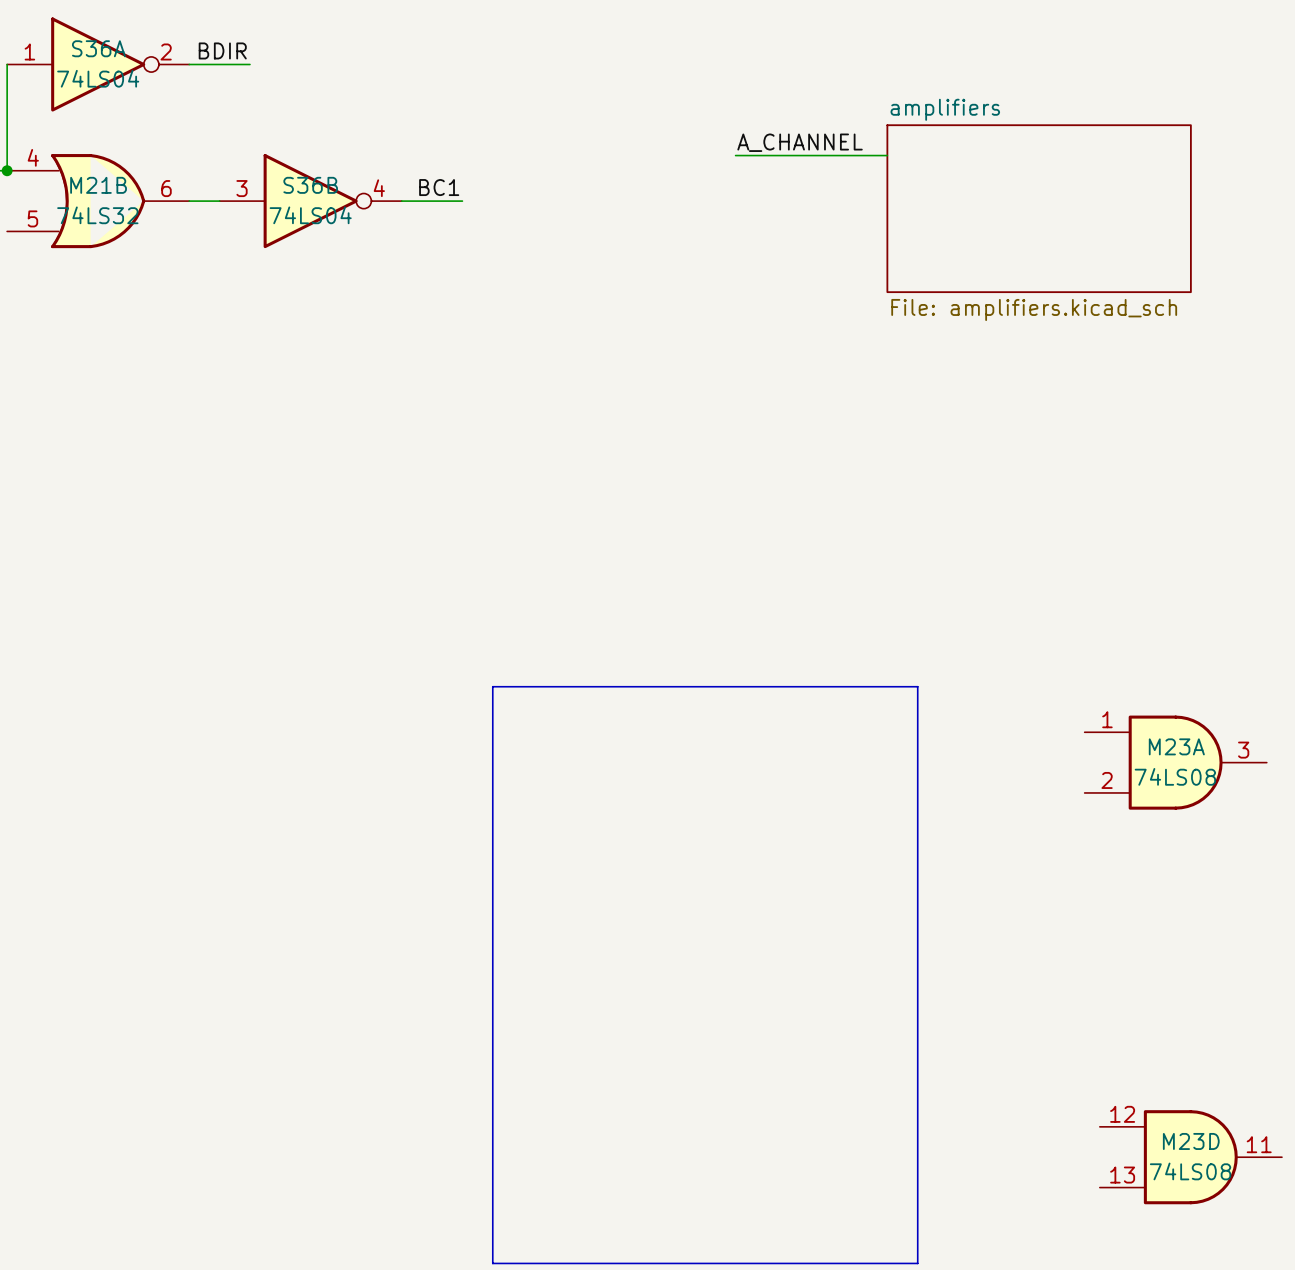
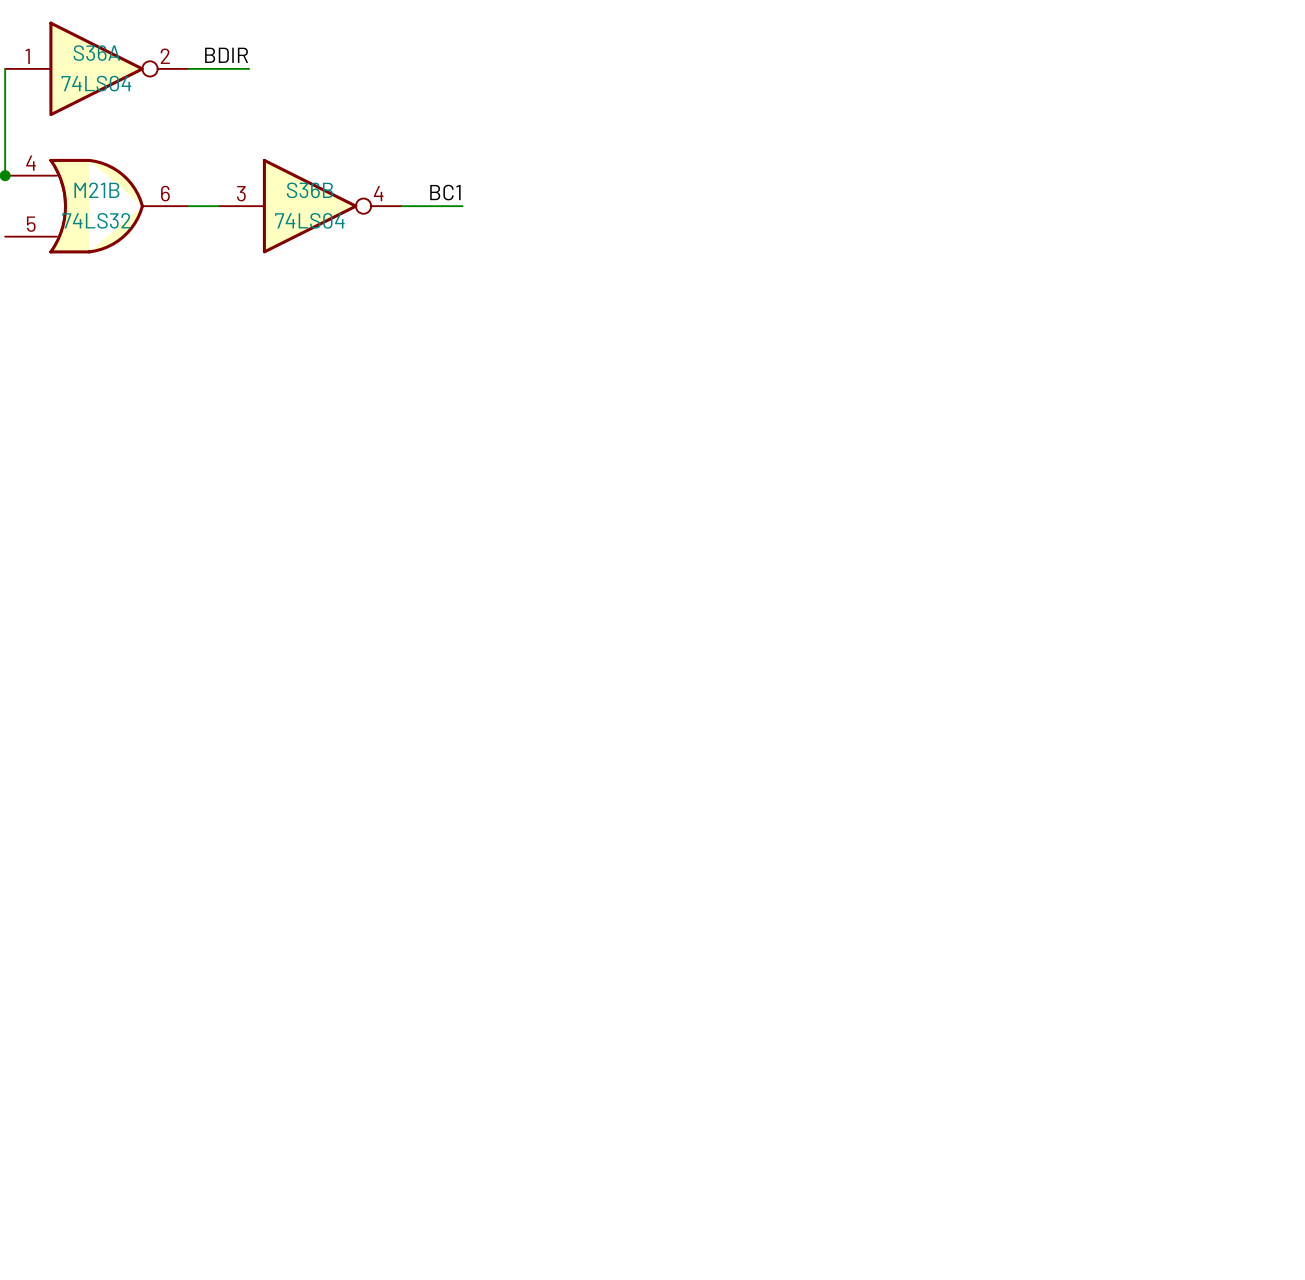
label: A_CHANNEL (800, 142) -> none
wire: (735, 155) (887, 155) -> none
sheet amplifiers: File: amplifiers.kicad_sch (1039, 208) -> none
line: (492, 686) (917, 686) (917, 1263) (492, 1263) (492, 686) -> none
M23A: 74LS08 (1175, 762) -> none
M23D: 74LS08 (1190, 1157) -> none

